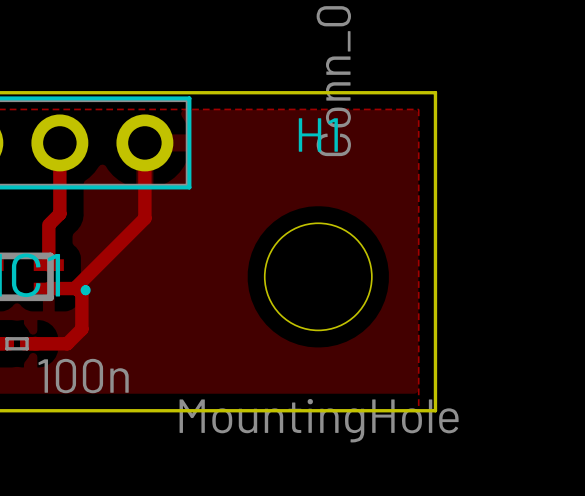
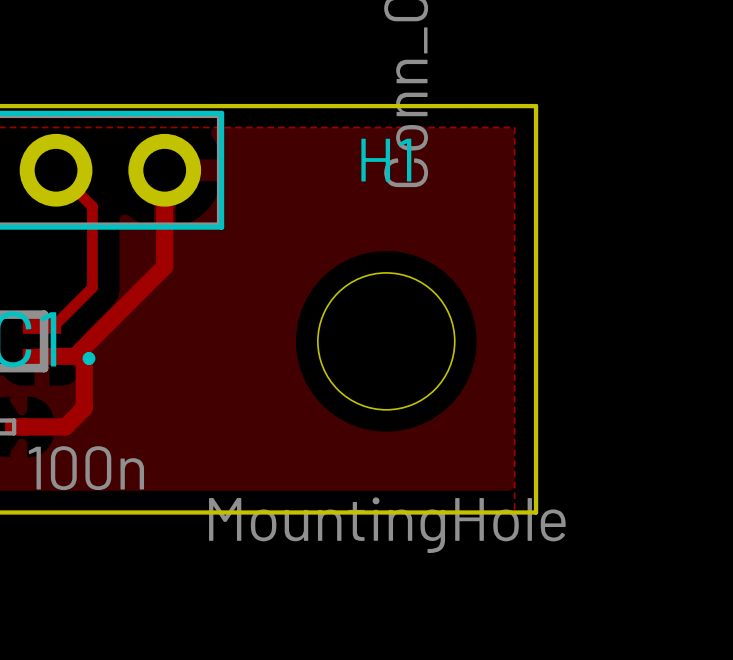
track: (59, 142) (59, 213) (48, 224) (48, 265) -> (56, 170) (92, 206) (92, 287) (53, 326) (41, 326)

